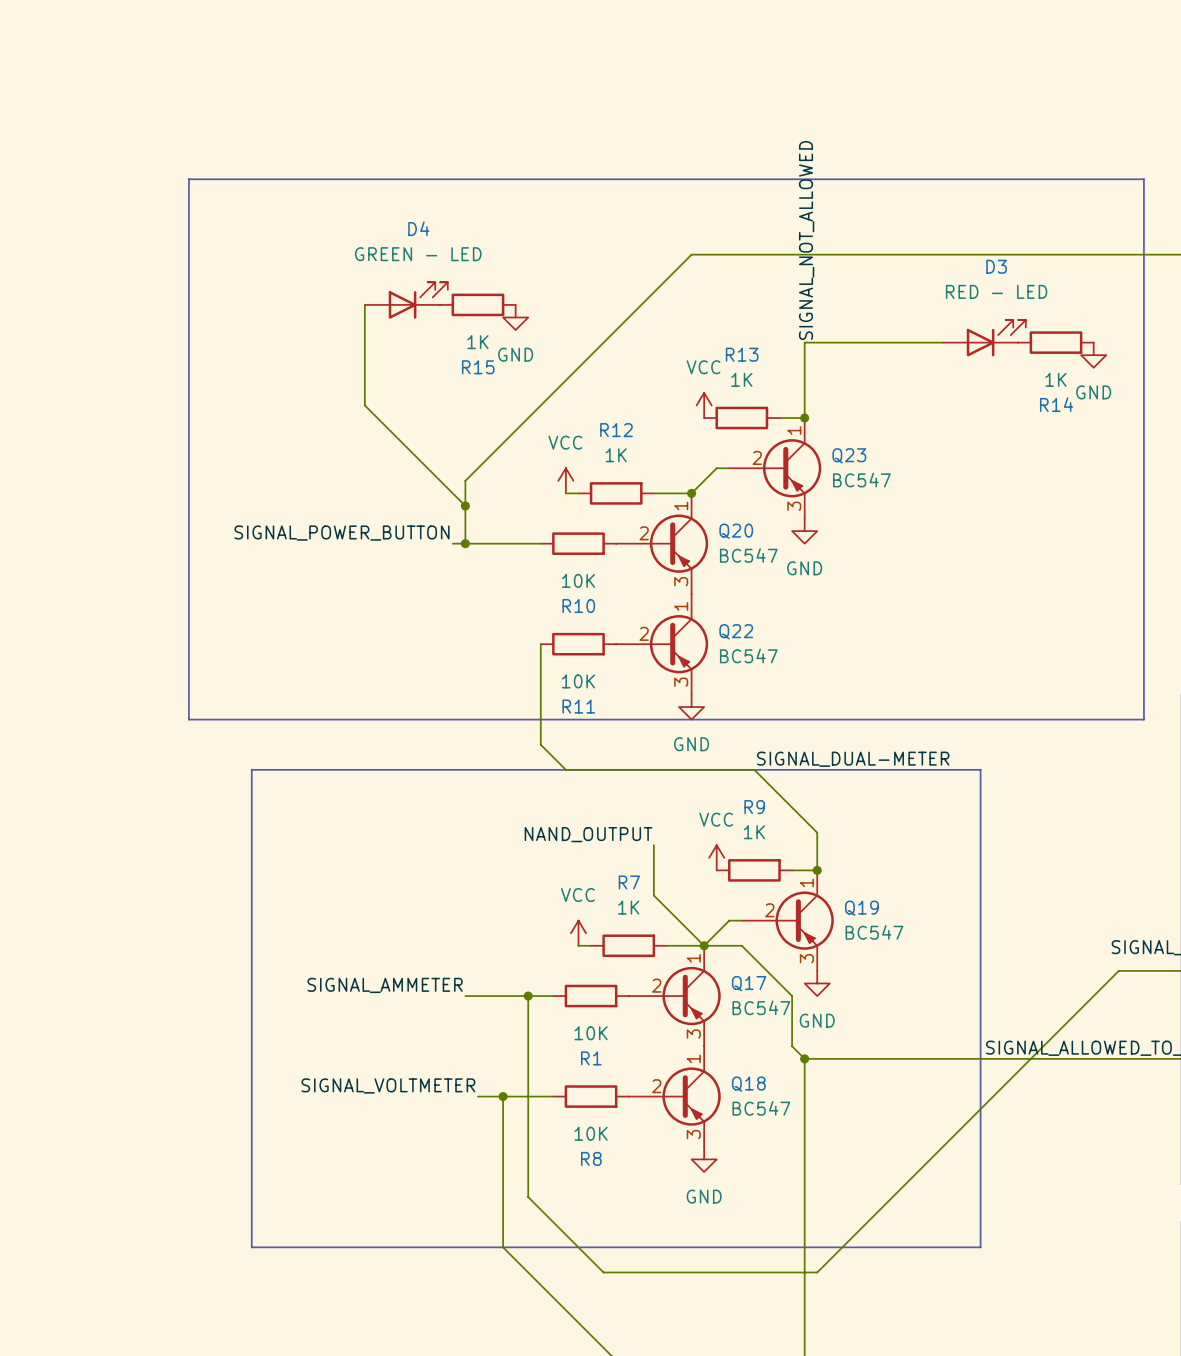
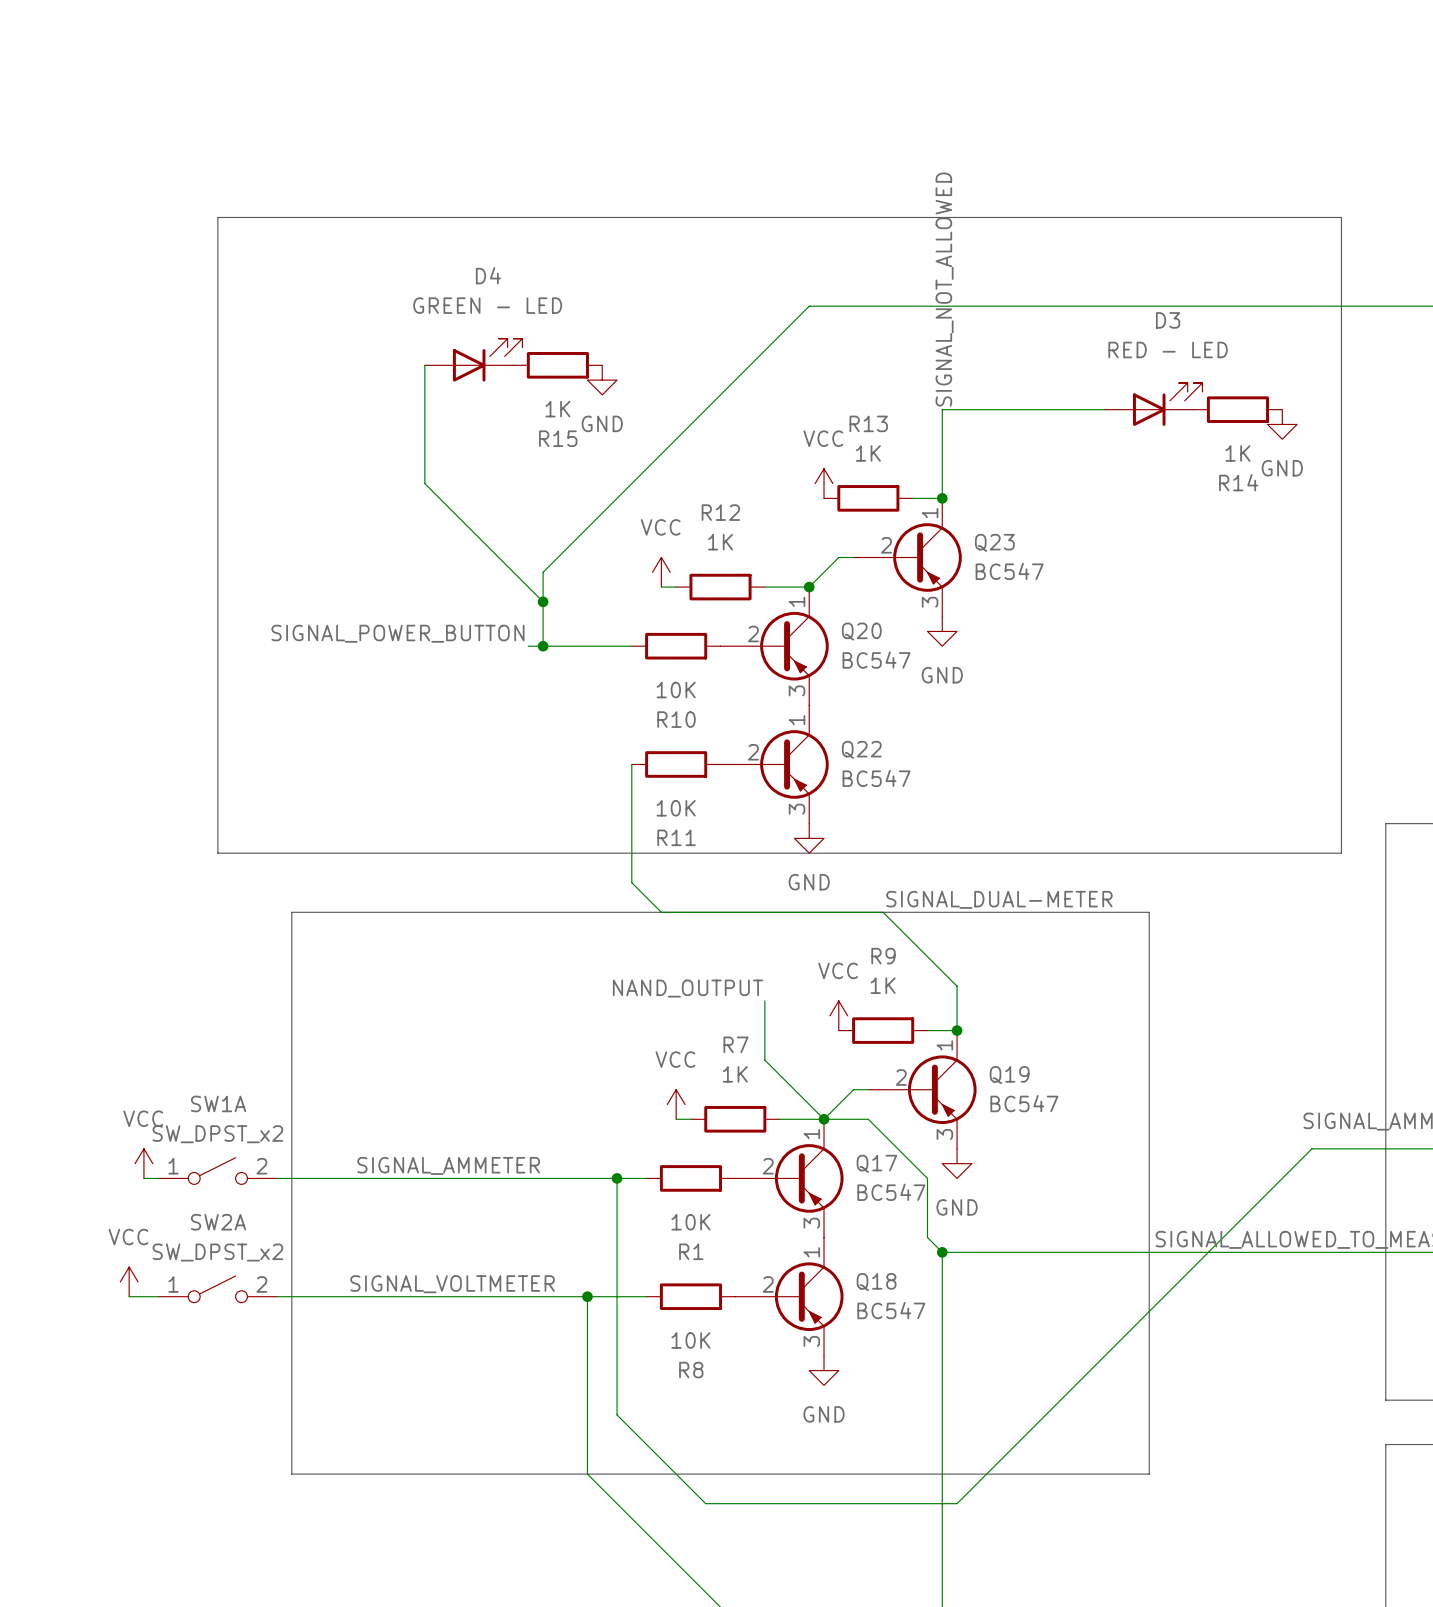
power symbol: none -> VCC (143, 1163)
SW1A: none -> SW_DPST_x2 (217, 1171)
wire: none -> (143, 1178) (158, 1178)
wire: none -> (277, 1178) (543, 1178)
power symbol: none -> VCC (129, 1281)
SW2A: none -> SW_DPST_x2 (217, 1289)
wire: none -> (129, 1296) (158, 1296)
wire: none -> (277, 1296) (557, 1296)

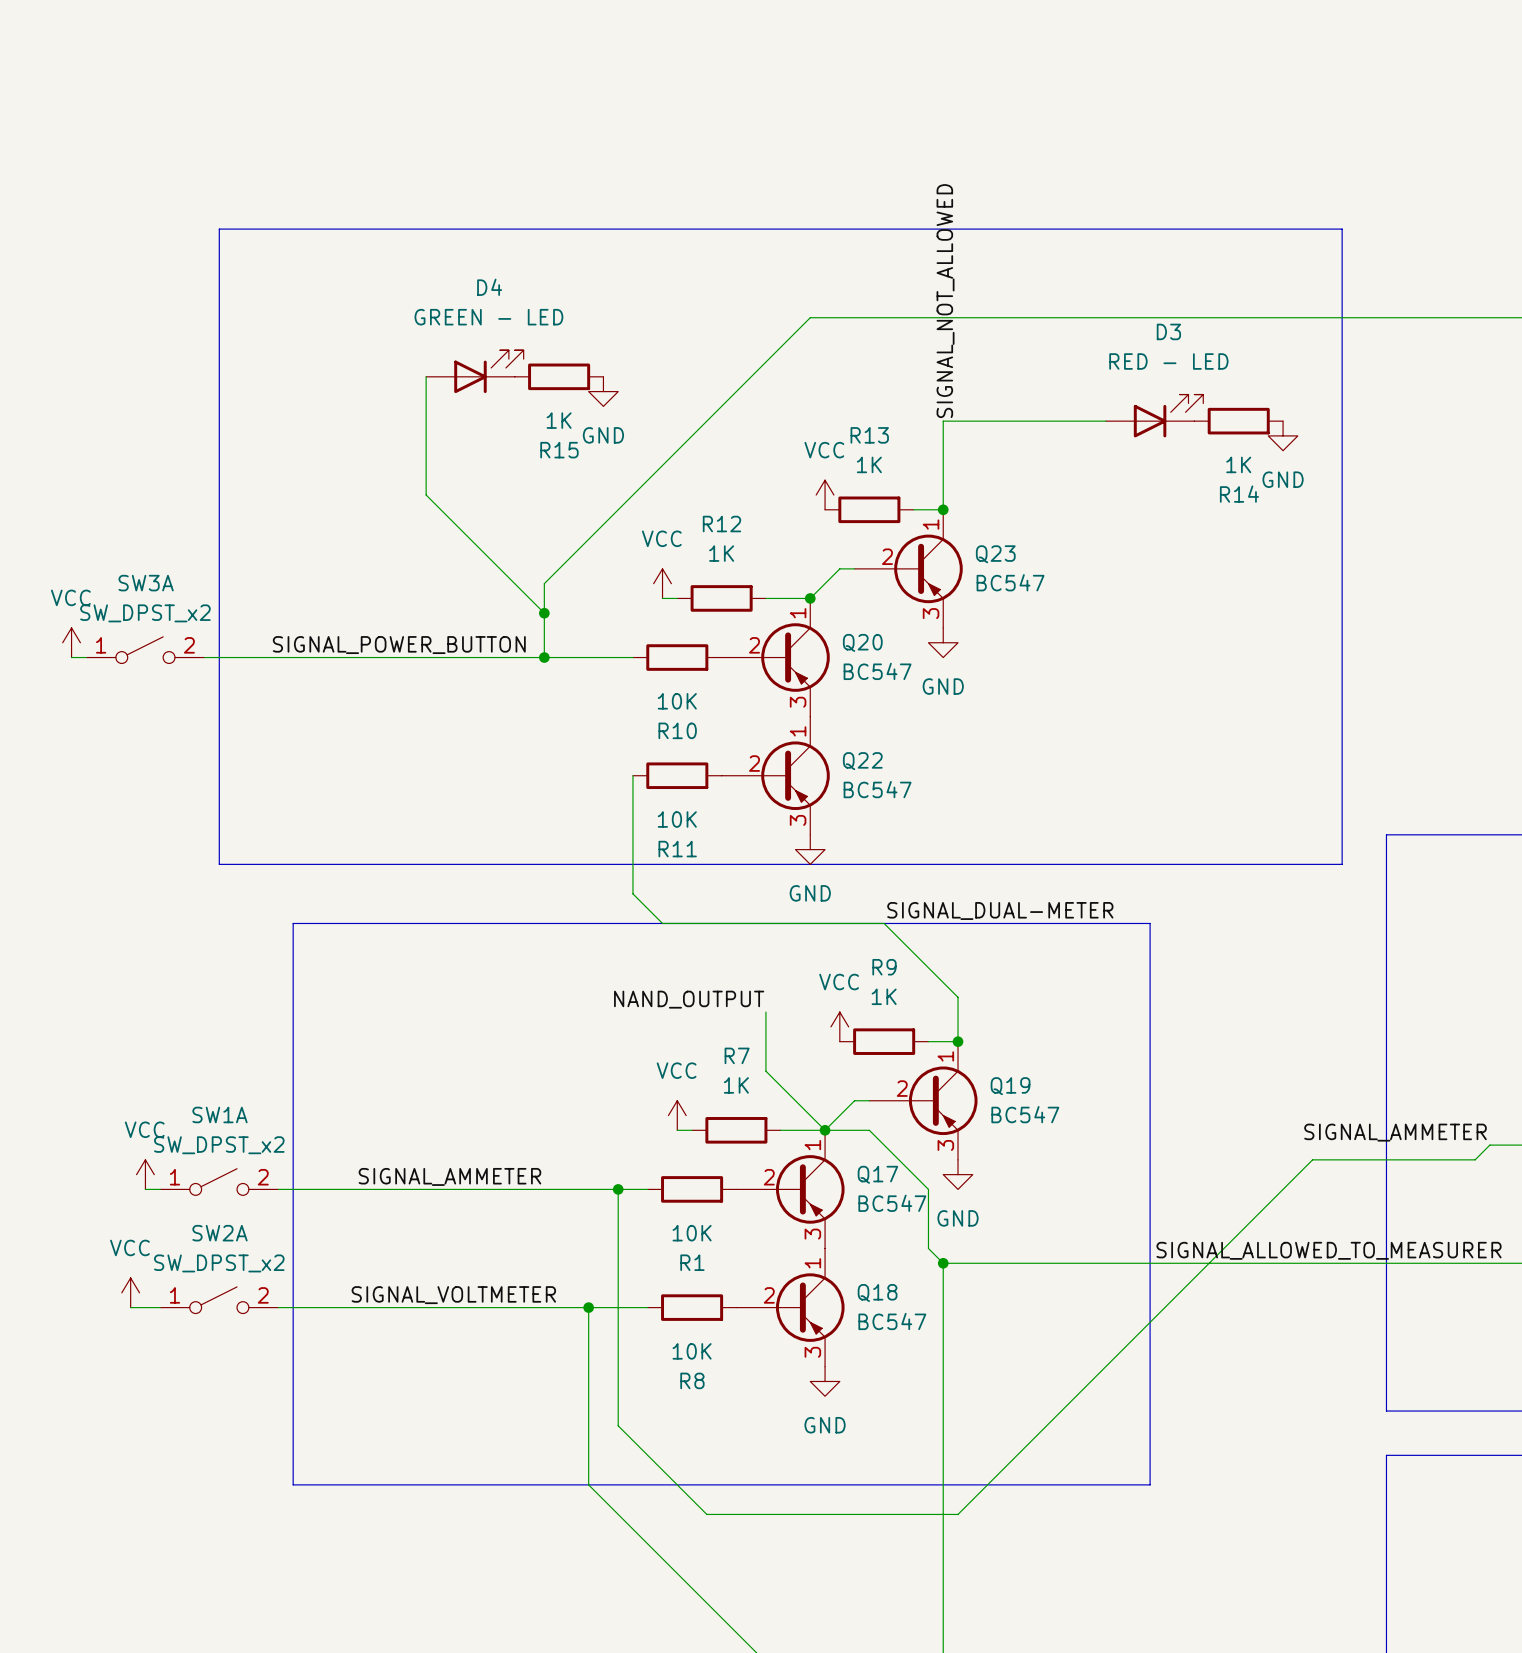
power symbol: none -> VCC (71, 642)
SW3A: none -> SW_DPST_x2 (145, 650)
wire: none -> (71, 657) (86, 657)
wire: none -> (204, 657) (529, 657)

